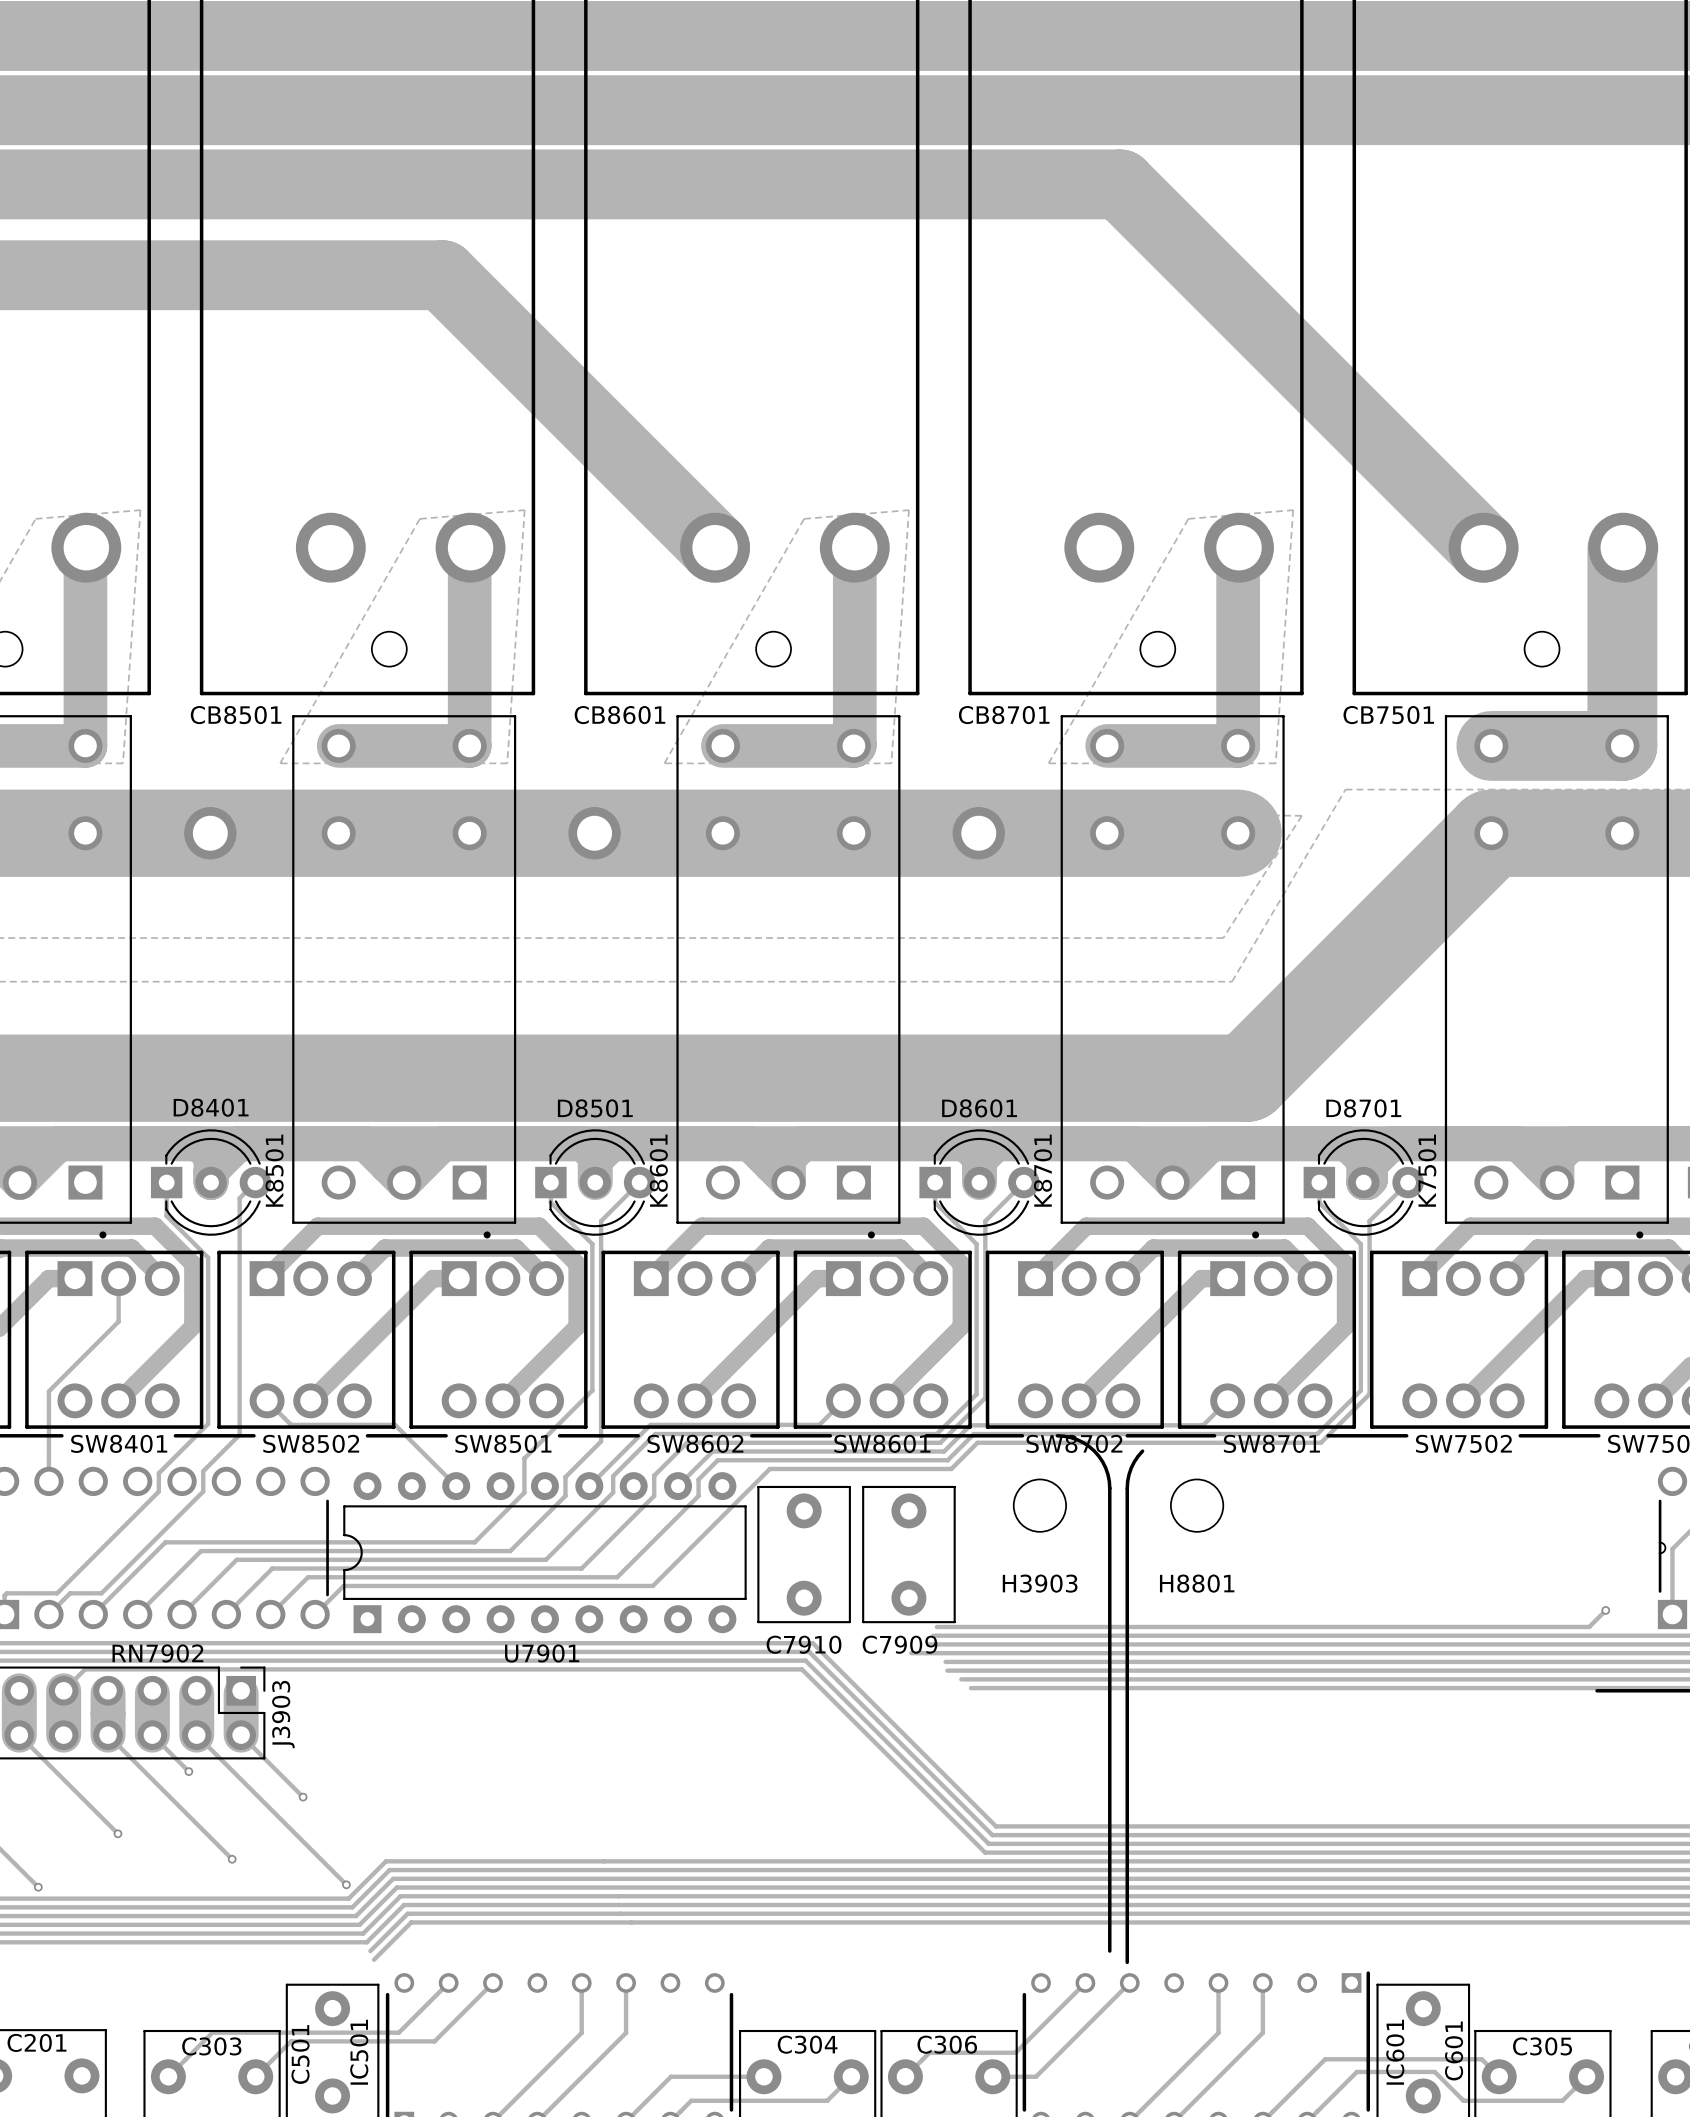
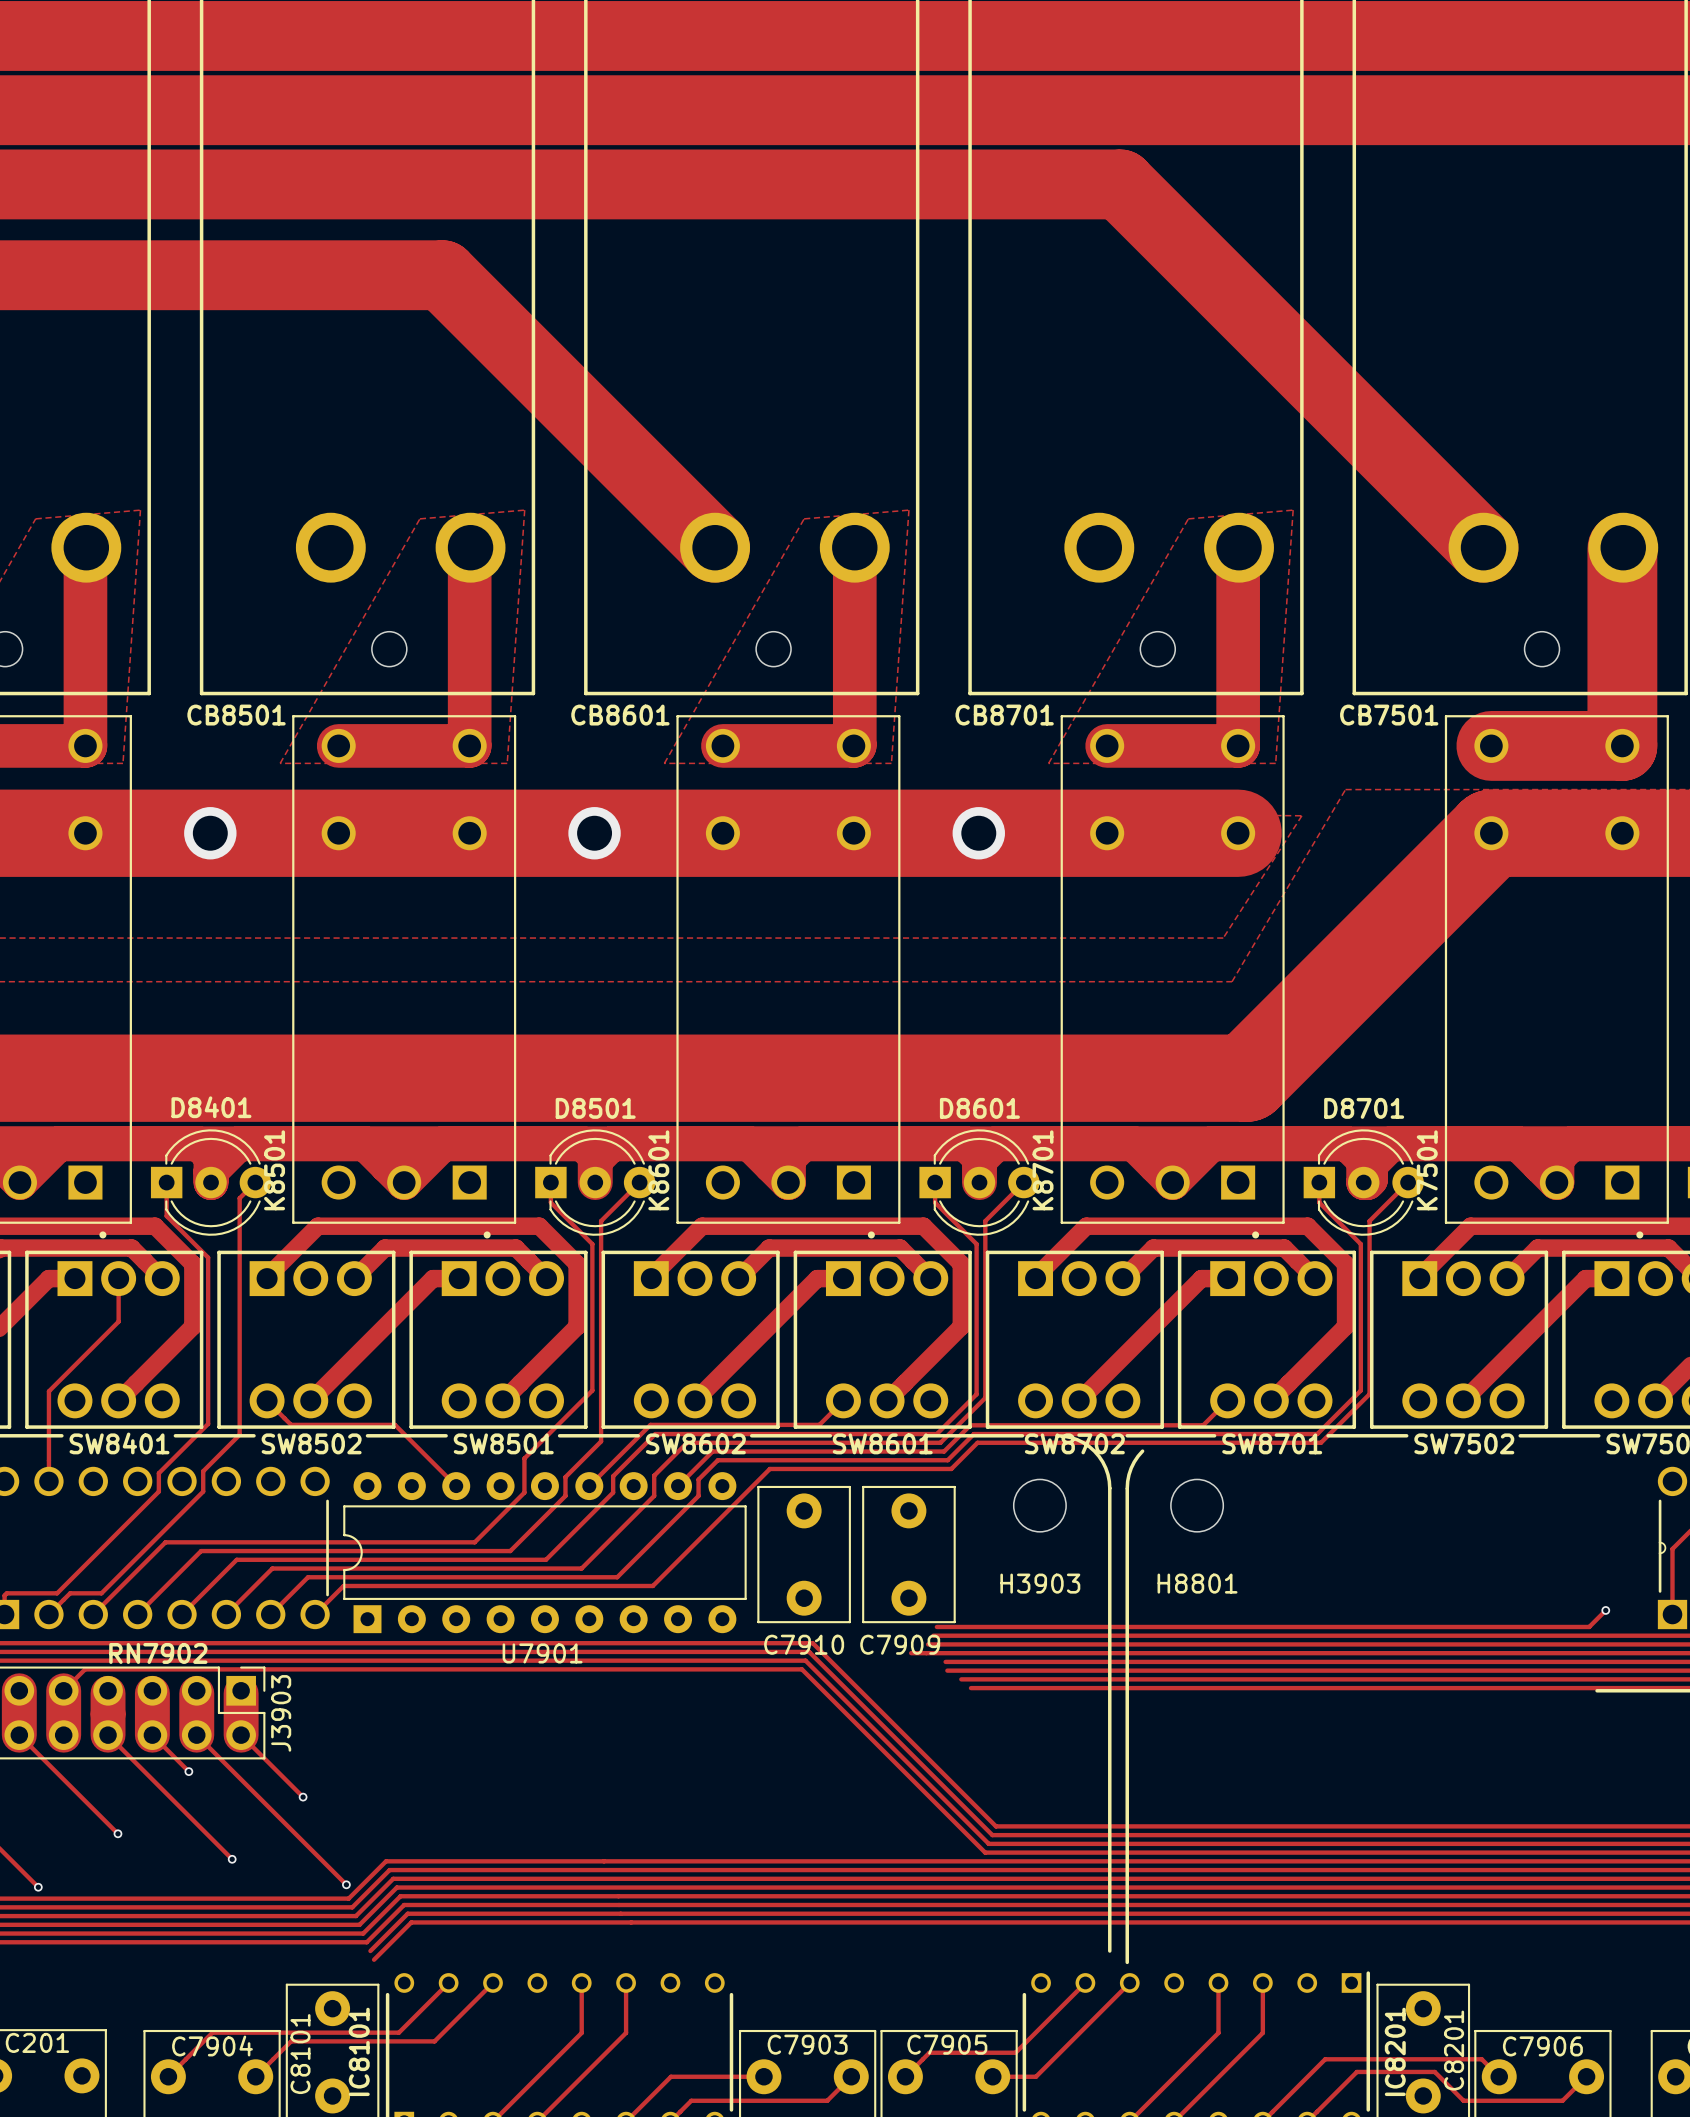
C304 name: C304 (807, 2044) -> C7903 (807, 2044)
C306 name: C306 (947, 2044) -> C7905 (947, 2044)
C303 name: C303 (211, 2046) -> C7904 (212, 2046)
C305 name: C305 (1542, 2046) -> C7906 (1542, 2046)
C601 name: C601 (1454, 2051) -> C8201 (1454, 2050)
IC501 name: IC501 (359, 2052) -> IC8101 (359, 2051)
IC601 name: IC601 (1395, 2052) -> IC8201 (1395, 2051)
C501 name: C501 (300, 2054) -> C8101 (300, 2054)

